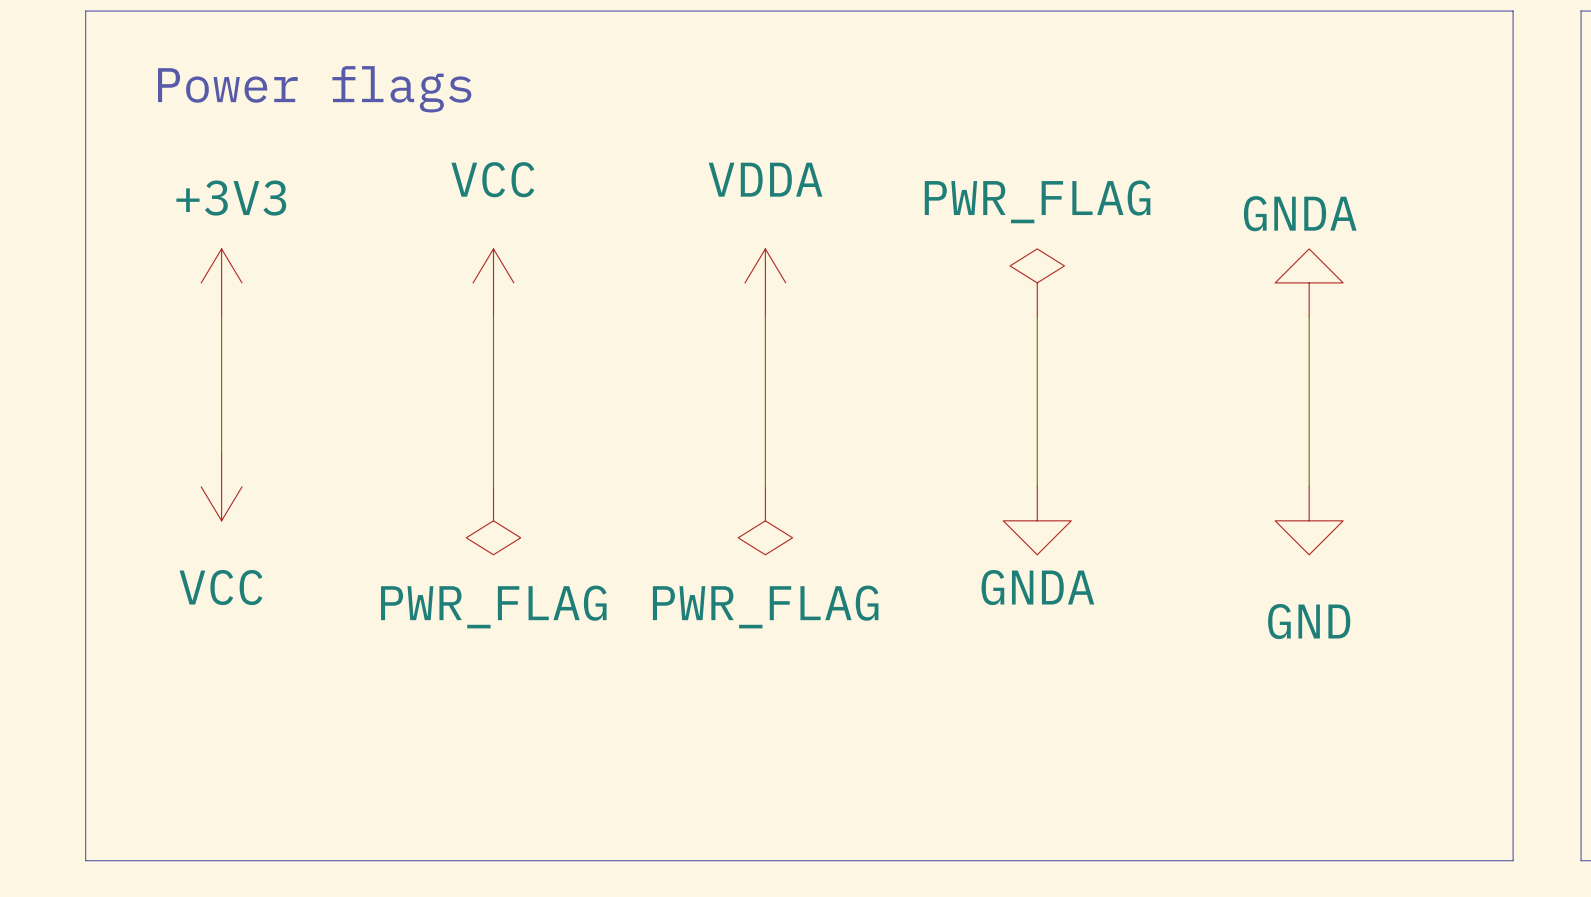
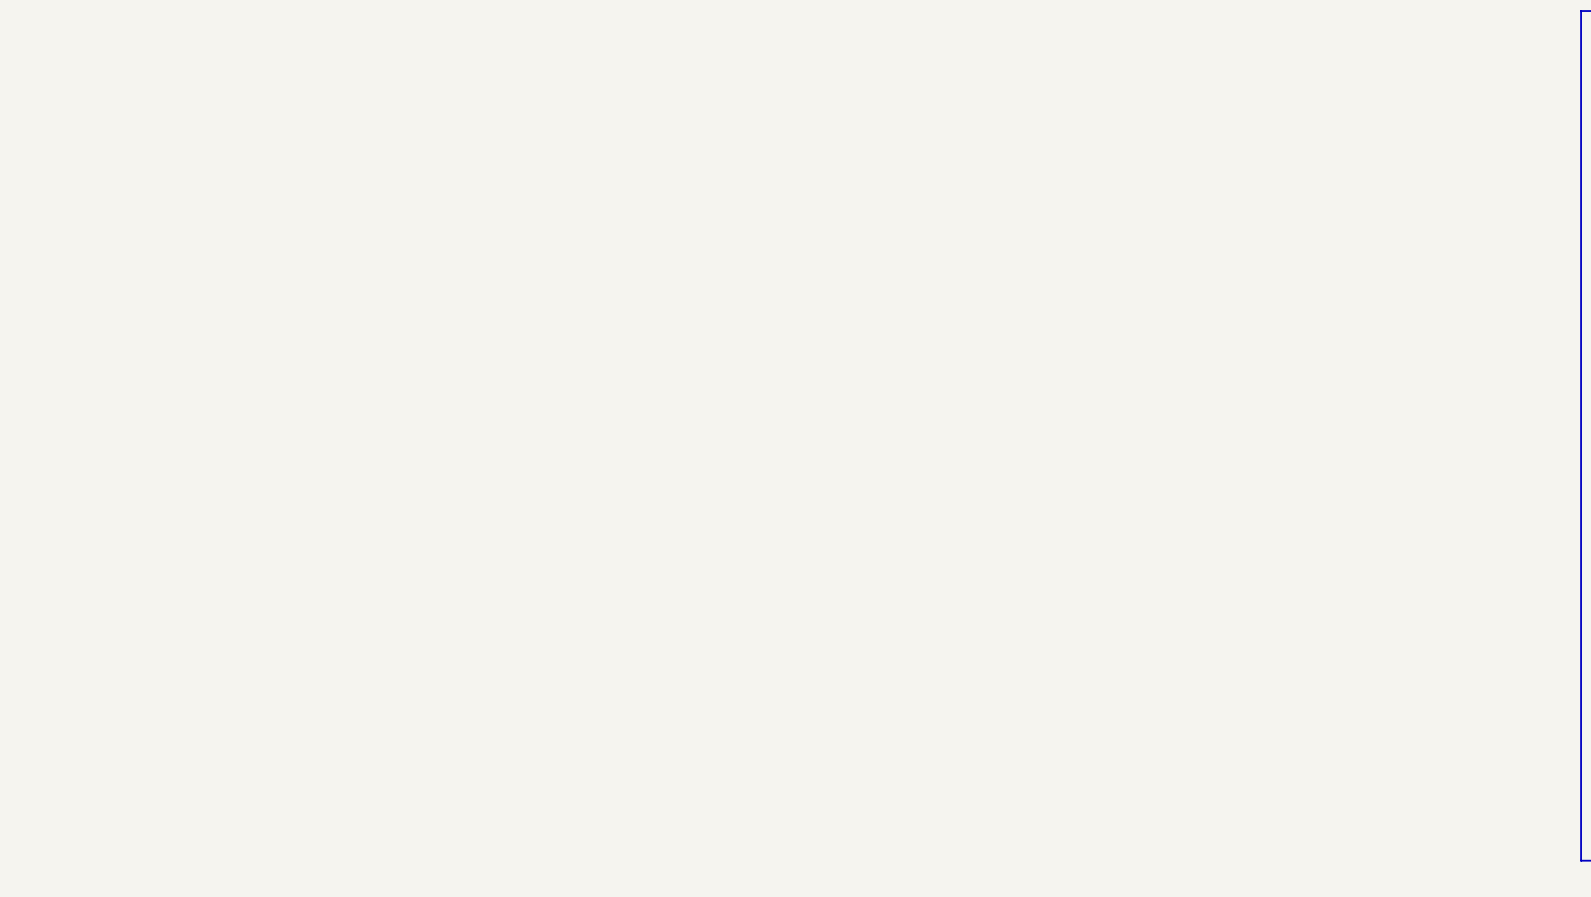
line: (85, 11) (1513, 11) (1513, 860) (85, 860) (85, 11) -> none
text: Power flags (314, 89) -> none
power symbol: +3V3 (221, 282) -> none
power symbol: VCC (493, 282) -> none
power symbol: VDDA (765, 282) -> none
power symbol: PWR_FLAG (1037, 282) -> none
power symbol: GNDA (1309, 282) -> none
wire: (221, 316) (221, 452) -> none
wire: (493, 316) (493, 486) -> none
wire: (765, 316) (765, 486) -> none
wire: (1037, 316) (1037, 486) -> none
wire: (1309, 316) (1309, 486) -> none
power symbol: VCC (221, 486) -> none
power symbol: PWR_FLAG (493, 520) -> none
power symbol: PWR_FLAG (765, 520) -> none
power symbol: GNDA (1037, 520) -> none
power symbol: GND (1309, 520) -> none

